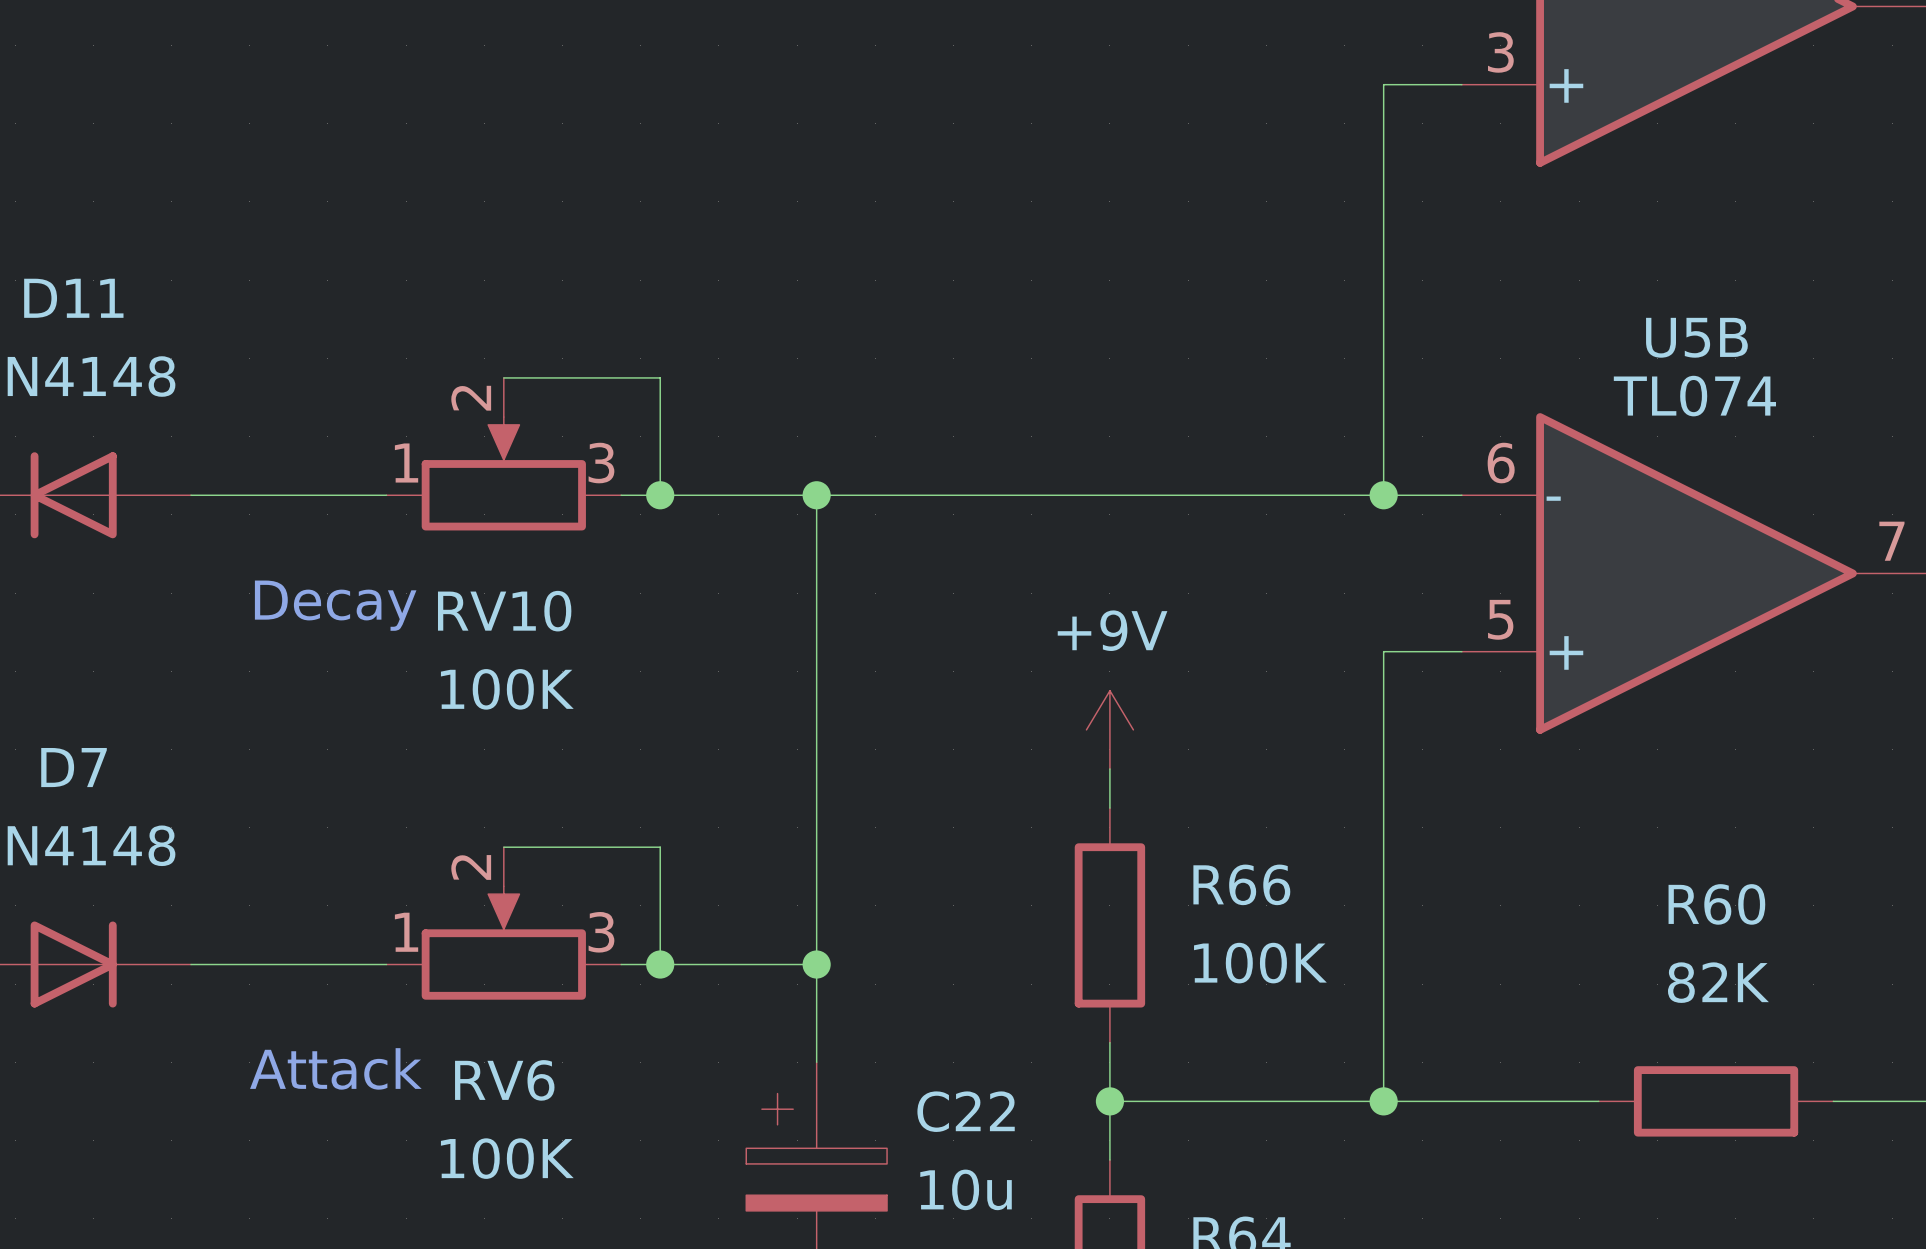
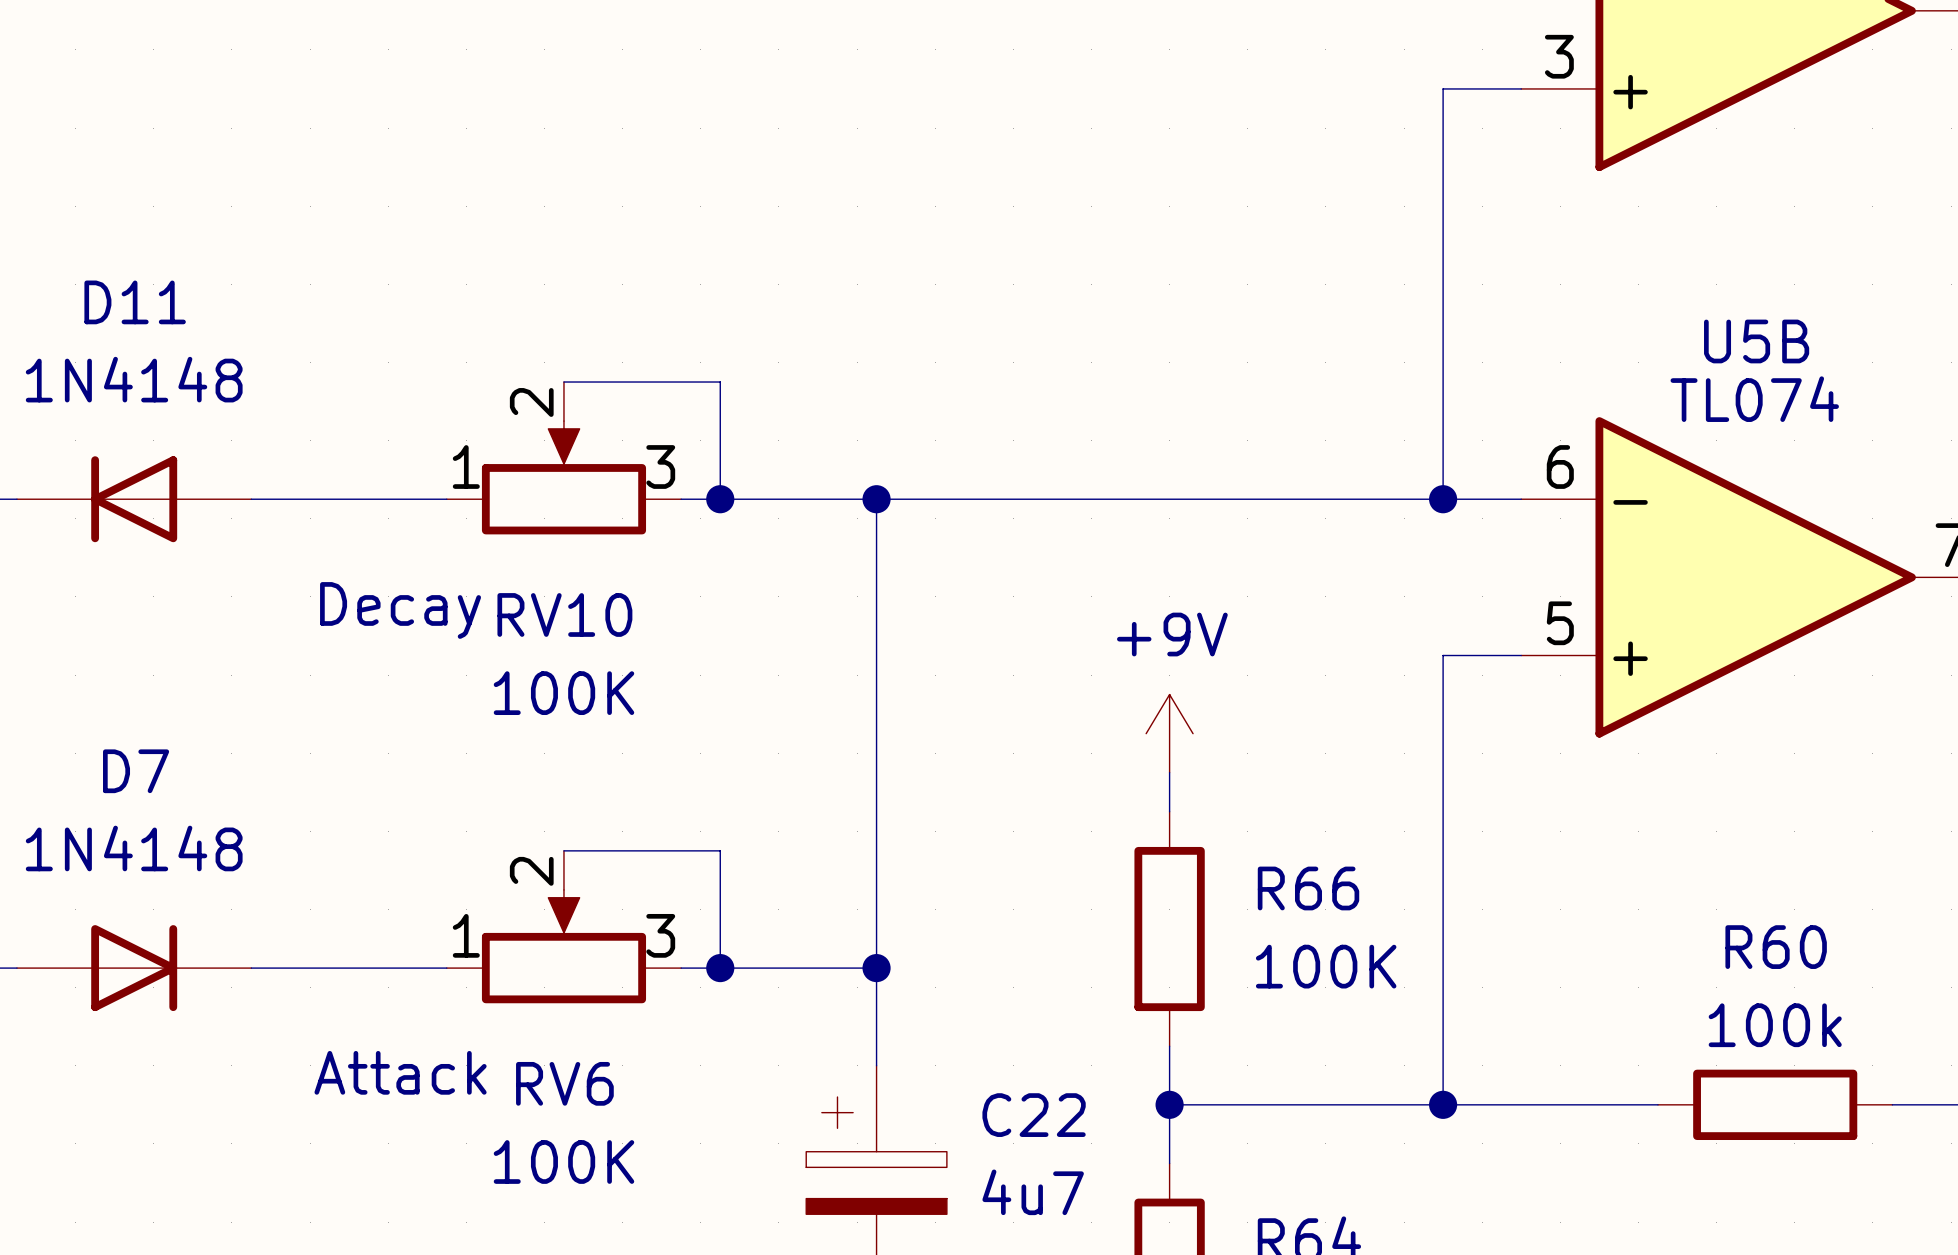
R60 name position: R60 (1716, 904) -> R60 (1776, 947)
R60 value: 82K (1718, 982) -> 100k (1775, 1025)
C22 value: 10u (966, 1189) -> 4u7 (1033, 1192)

